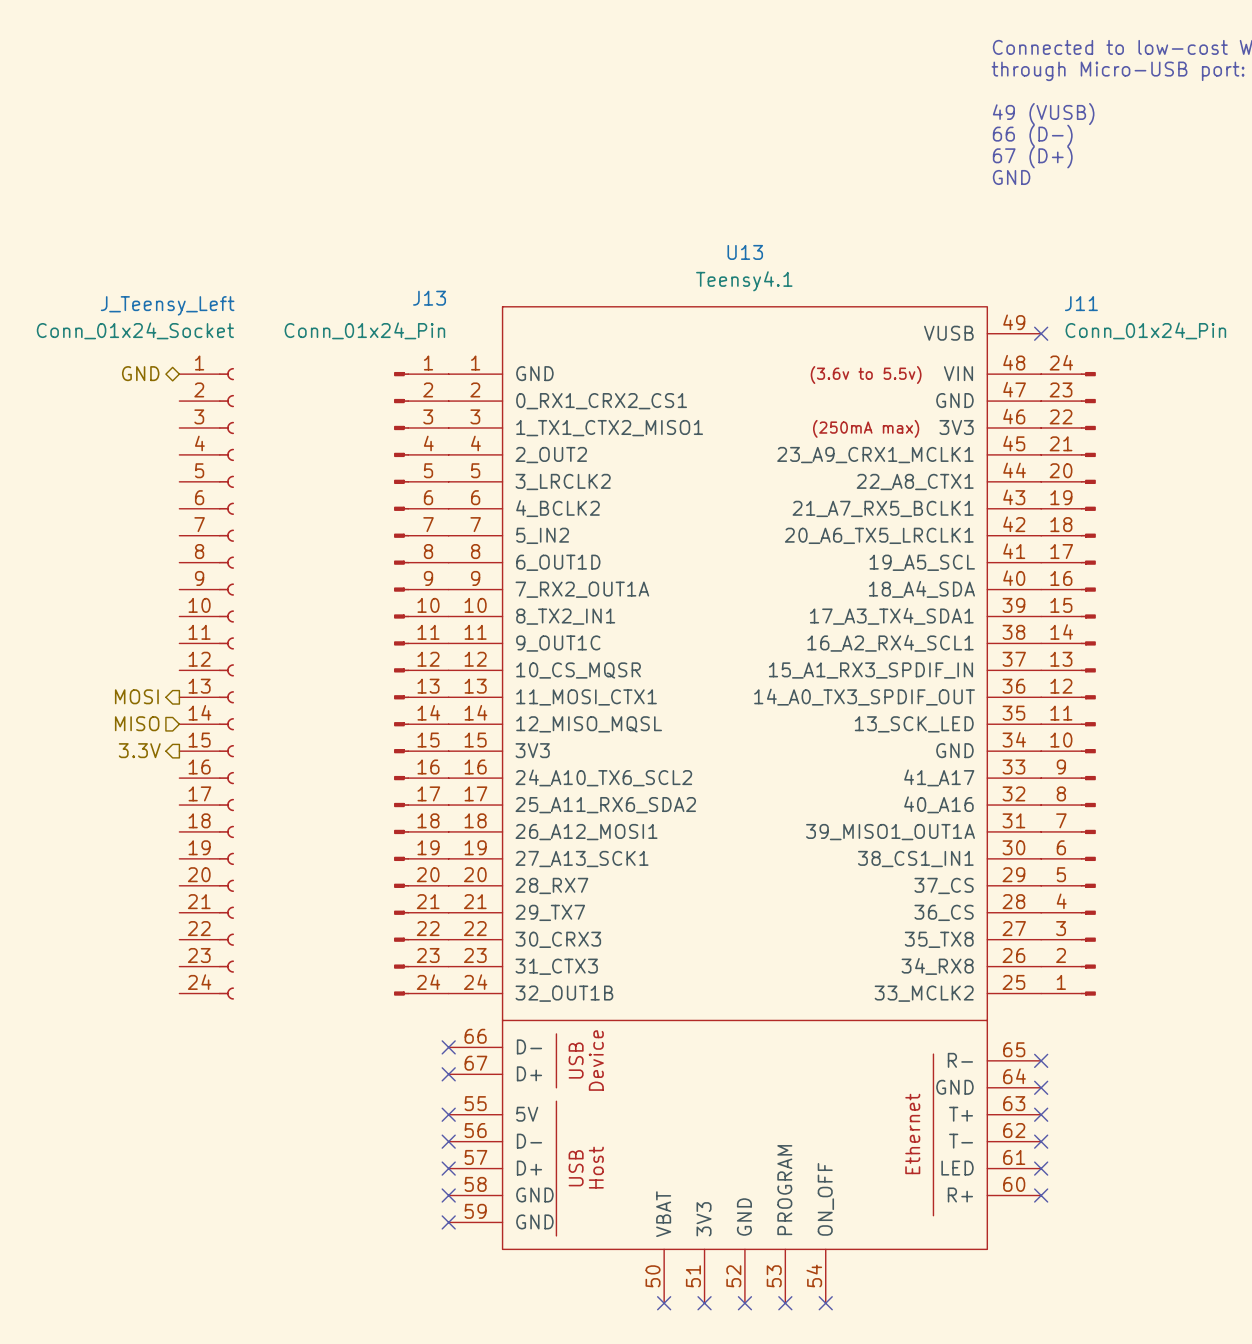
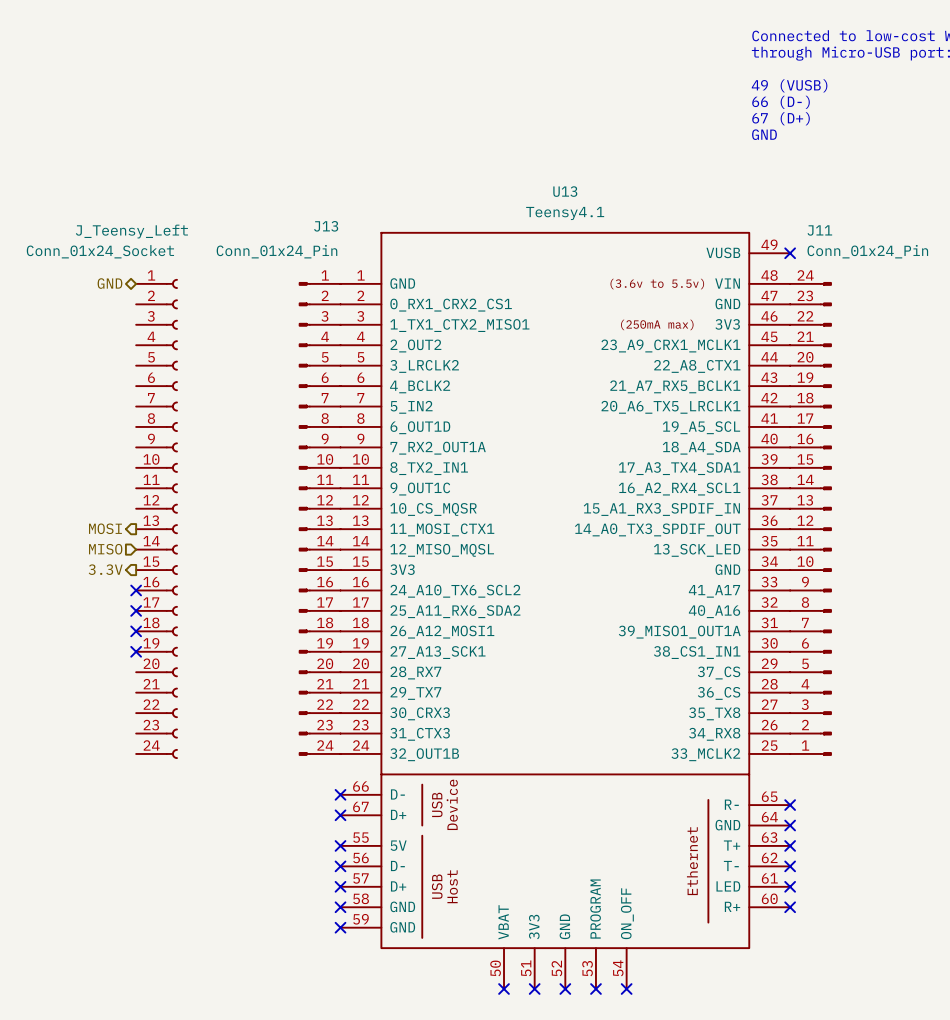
no-connect mark: none -> (136, 590)
no-connect mark: none -> (136, 610)
no-connect mark: none -> (136, 631)
no-connect mark: none -> (136, 651)

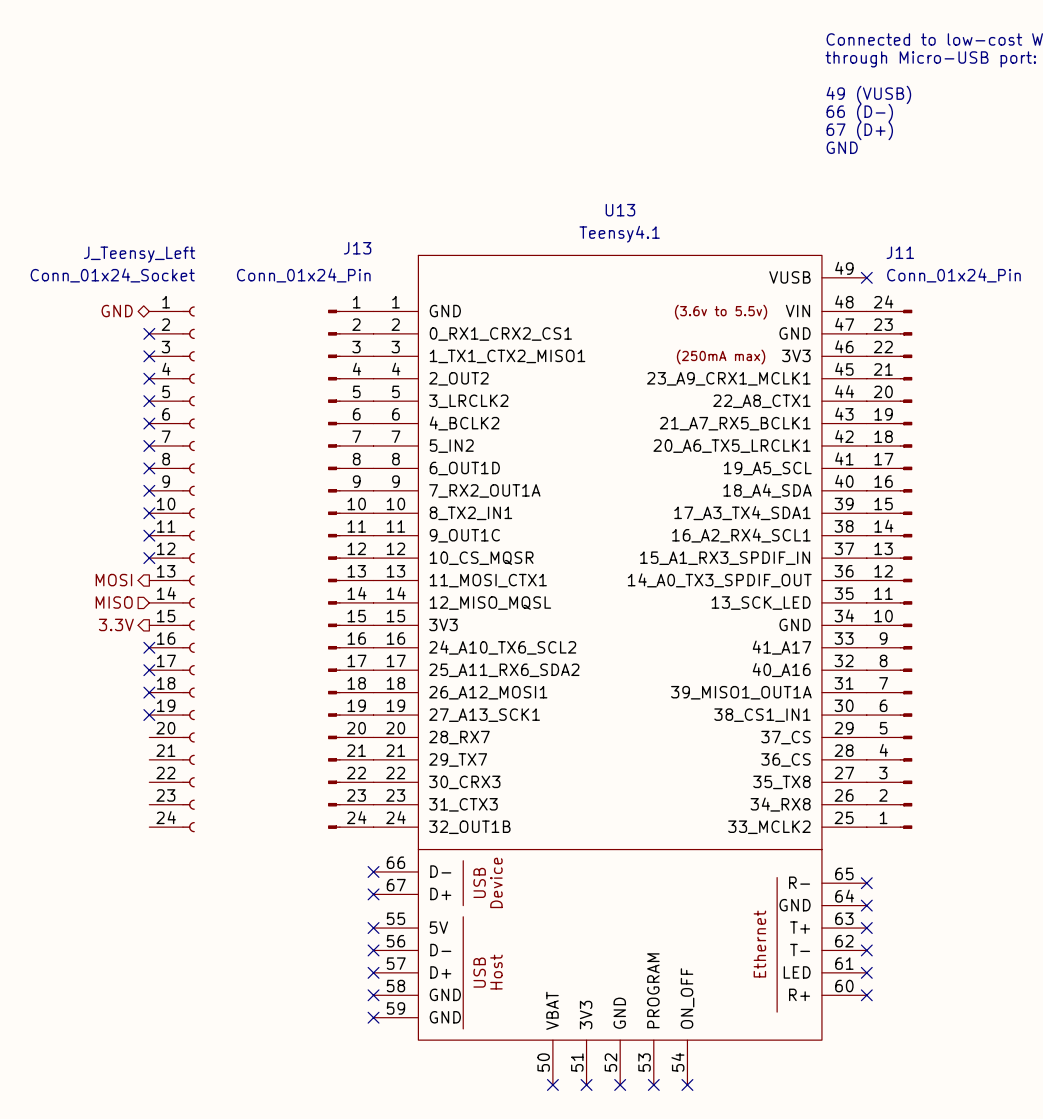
no-connect mark: none -> (149, 333)
no-connect mark: none -> (149, 356)
no-connect mark: none -> (149, 378)
no-connect mark: none -> (149, 401)
no-connect mark: none -> (149, 423)
no-connect mark: none -> (149, 445)
no-connect mark: none -> (149, 468)
no-connect mark: none -> (149, 490)
no-connect mark: none -> (149, 513)
no-connect mark: none -> (149, 535)
no-connect mark: none -> (149, 558)

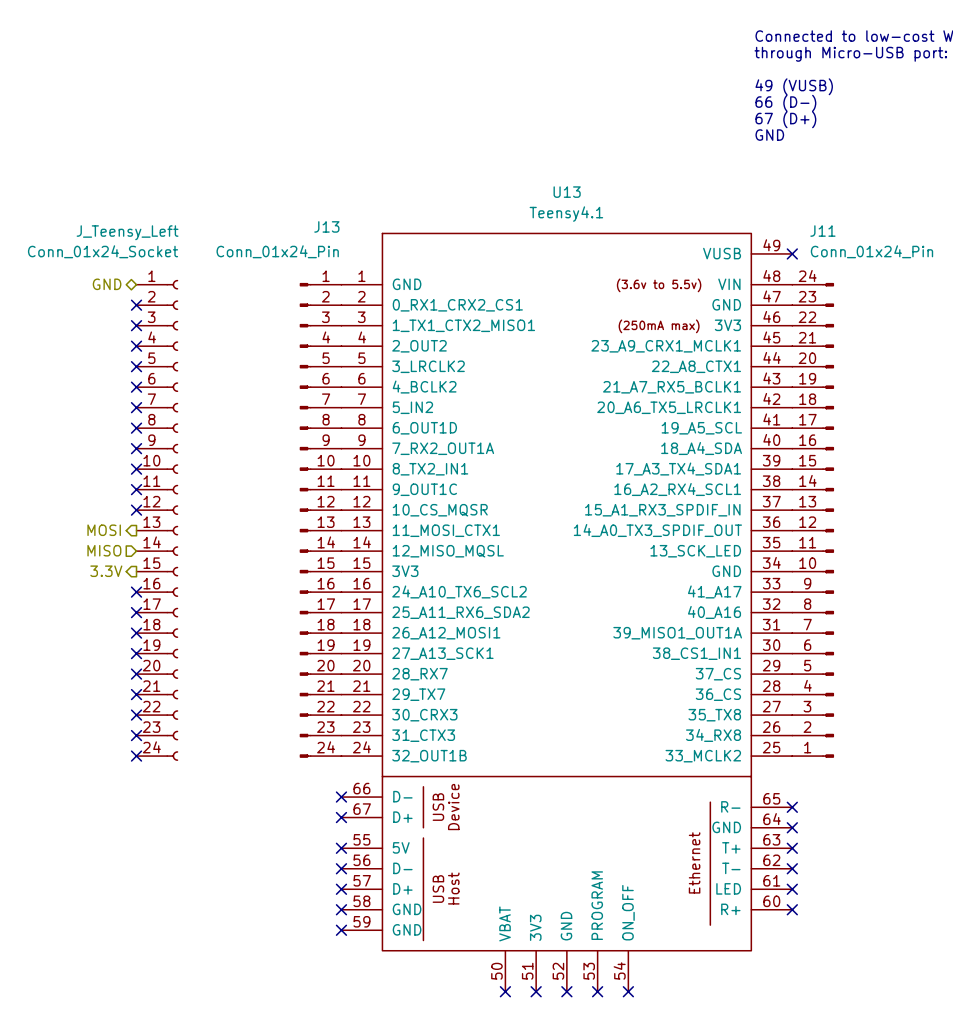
no-connect mark: none -> (136, 674)
no-connect mark: none -> (136, 694)
no-connect mark: none -> (136, 715)
no-connect mark: none -> (136, 735)
no-connect mark: none -> (136, 756)

